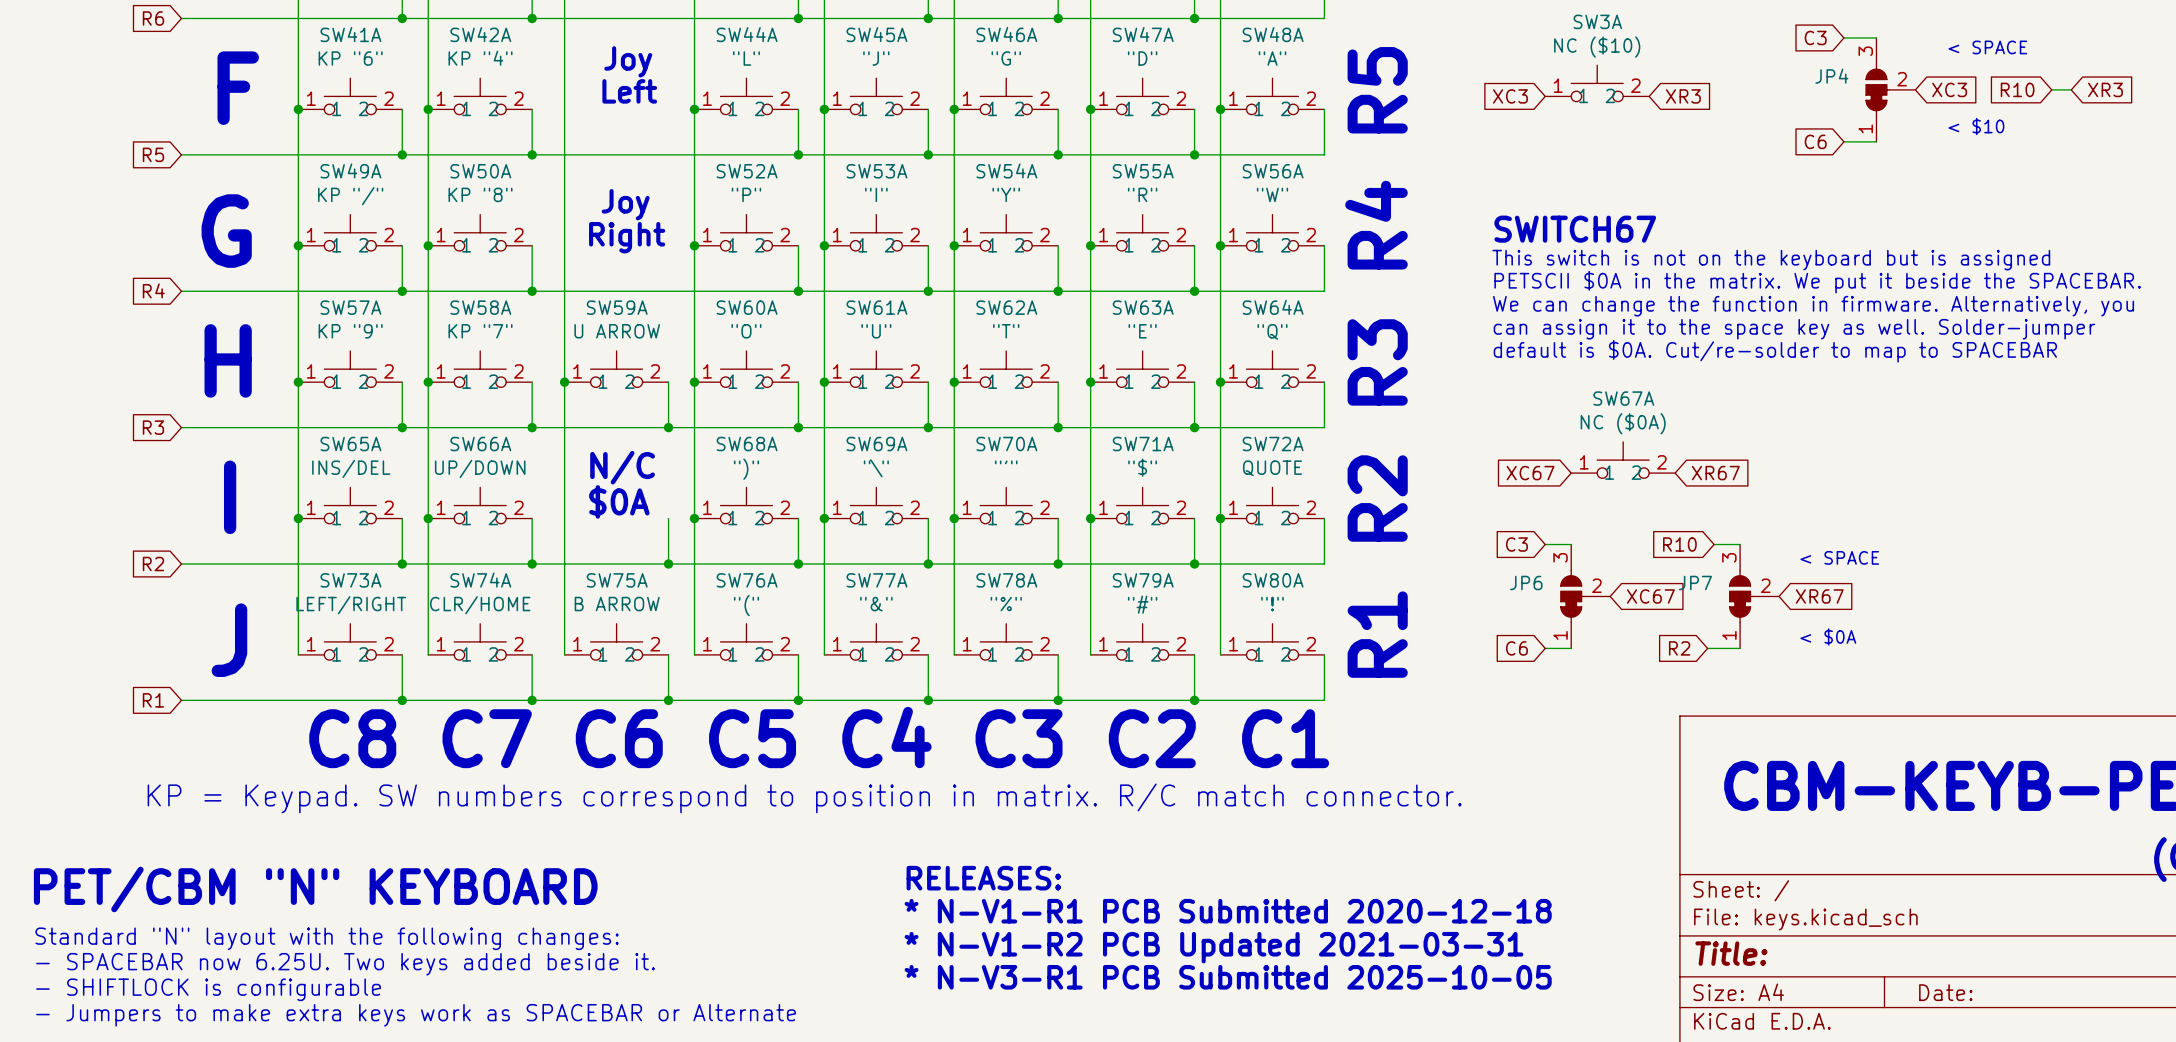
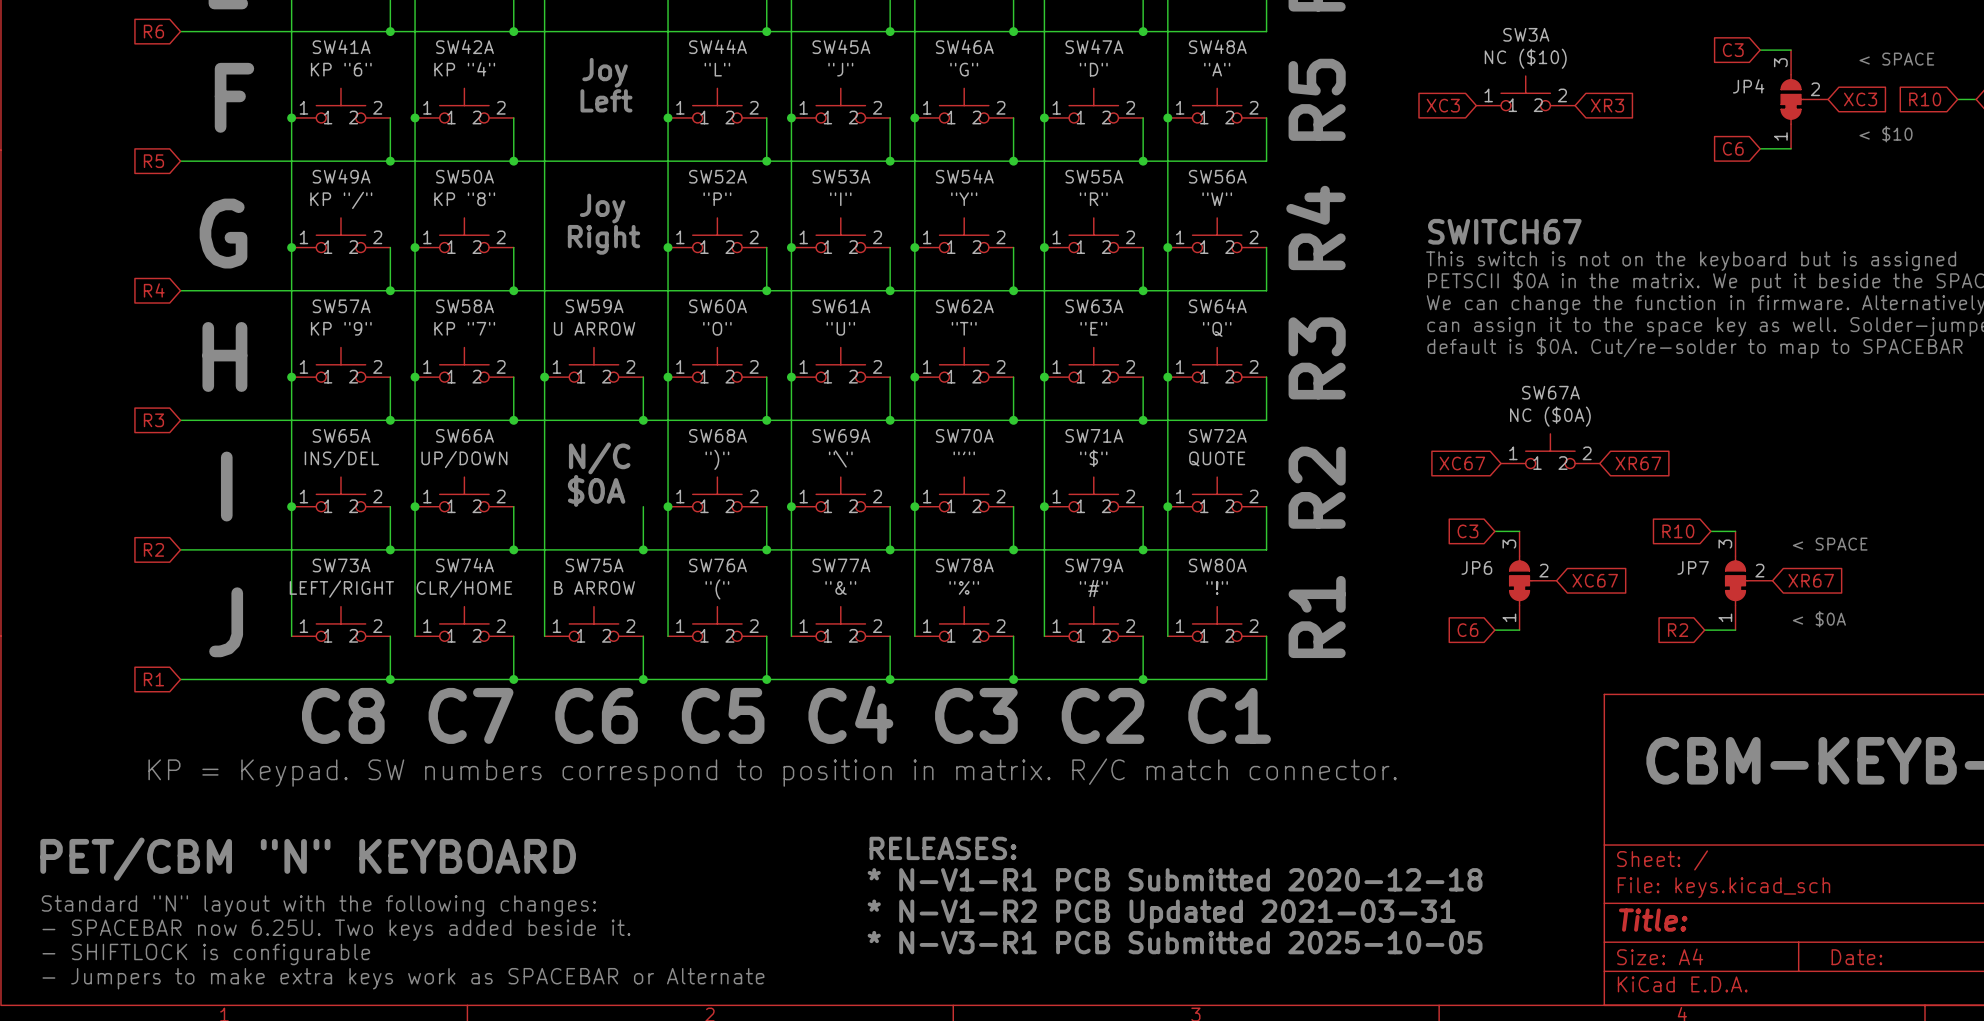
global label position: C3 (1516, 544) -> C3 (1467, 531)
wire: (1545, 544) (1564, 544) -> (1501, 531) (1519, 531)
global label position: R10 (1679, 544) -> R10 (1678, 531)
wire: (1714, 544) (1740, 544) -> (1710, 531) (1735, 531)
text position: < SPACE (1839, 557) -> < SPACE (1830, 544)
JP6 position: (1585, 596) -> (1533, 580)
global label position: XC67 (1650, 596) -> XC67 (1595, 580)
JP7 position: (1754, 596) -> (1749, 580)
global label position: XR67 (1819, 596) -> XR67 (1811, 580)
text position: < $0A (1828, 636) -> < $0A (1819, 619)
global label position: C6 (1516, 648) -> C6 (1467, 630)
wire: (1545, 648) (1564, 648) -> (1501, 630) (1519, 630)
global label position: R2 (1679, 648) -> R2 (1678, 630)
wire: (1707, 648) (1740, 648) -> (1704, 630) (1735, 630)

